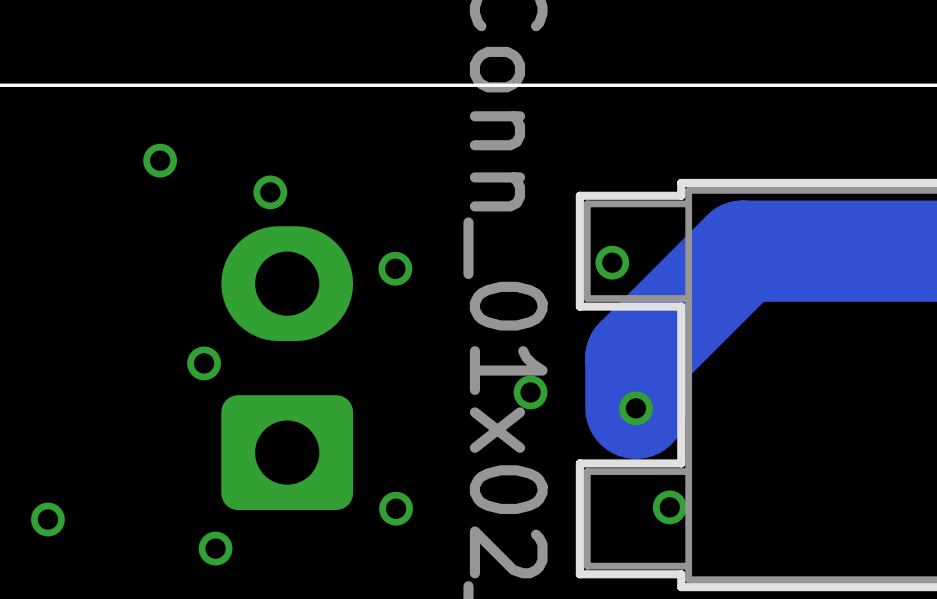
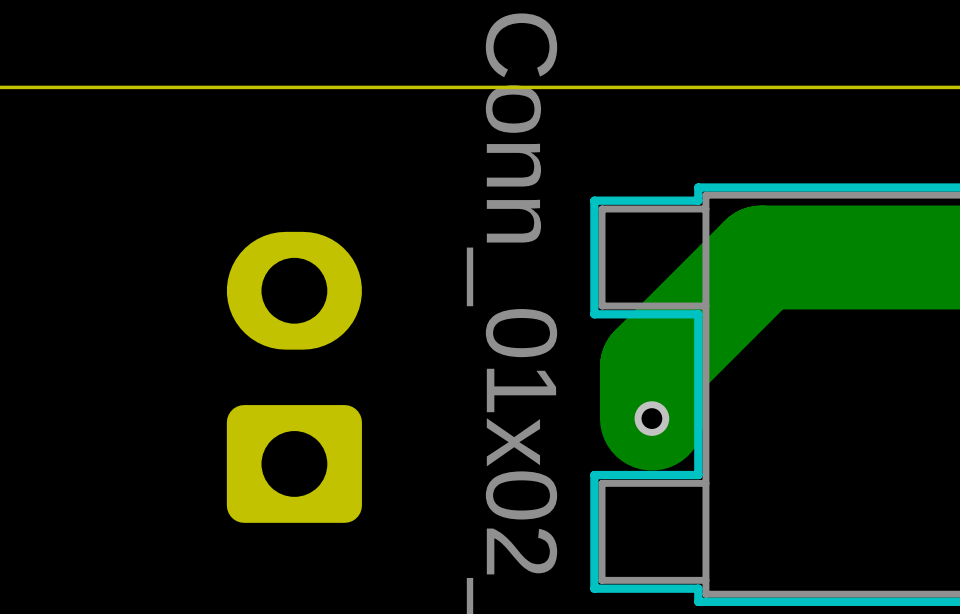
via: (160, 160) -> none
via: (270, 192) -> none
via: (612, 262) -> none
via: (395, 268) -> none
via: (204, 363) -> none
via: (530, 392) -> none
via: (669, 507) -> none
via: (396, 508) -> none
via: (47, 519) -> none
via: (215, 548) -> none

